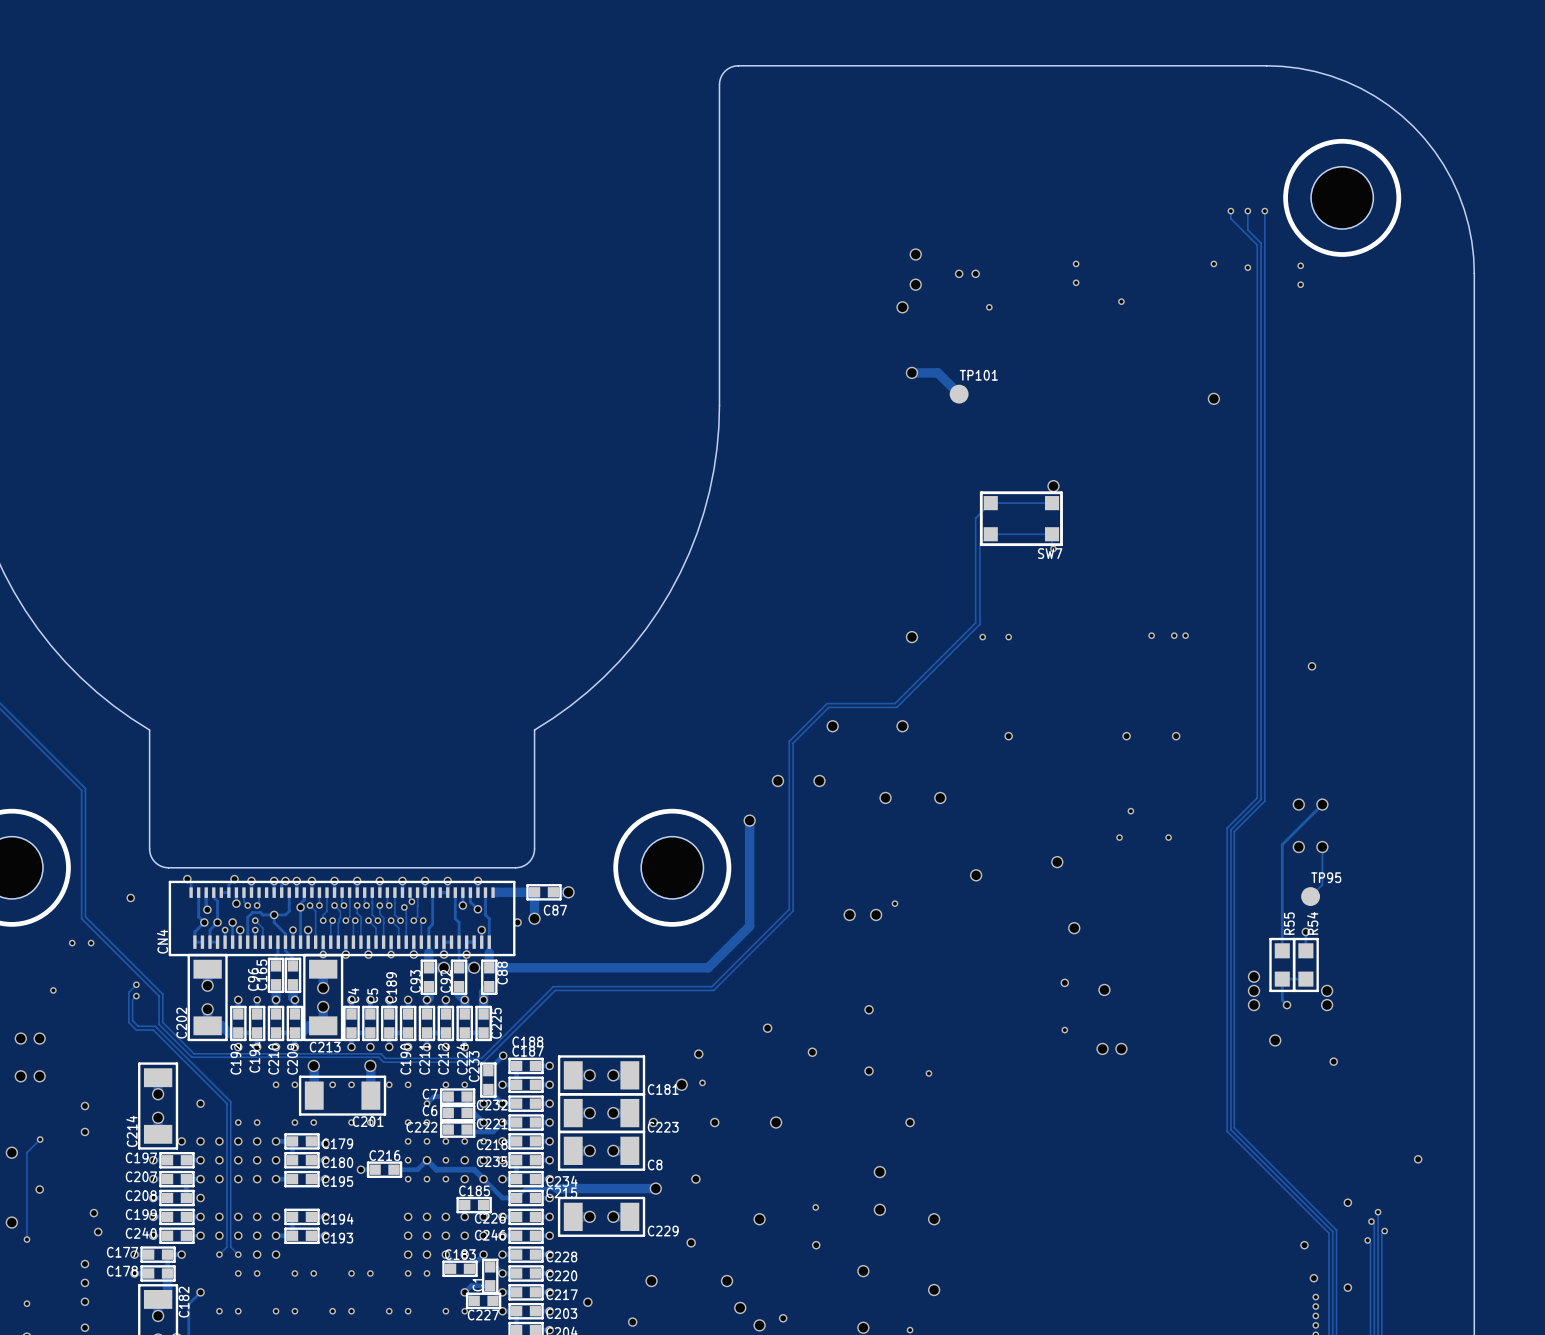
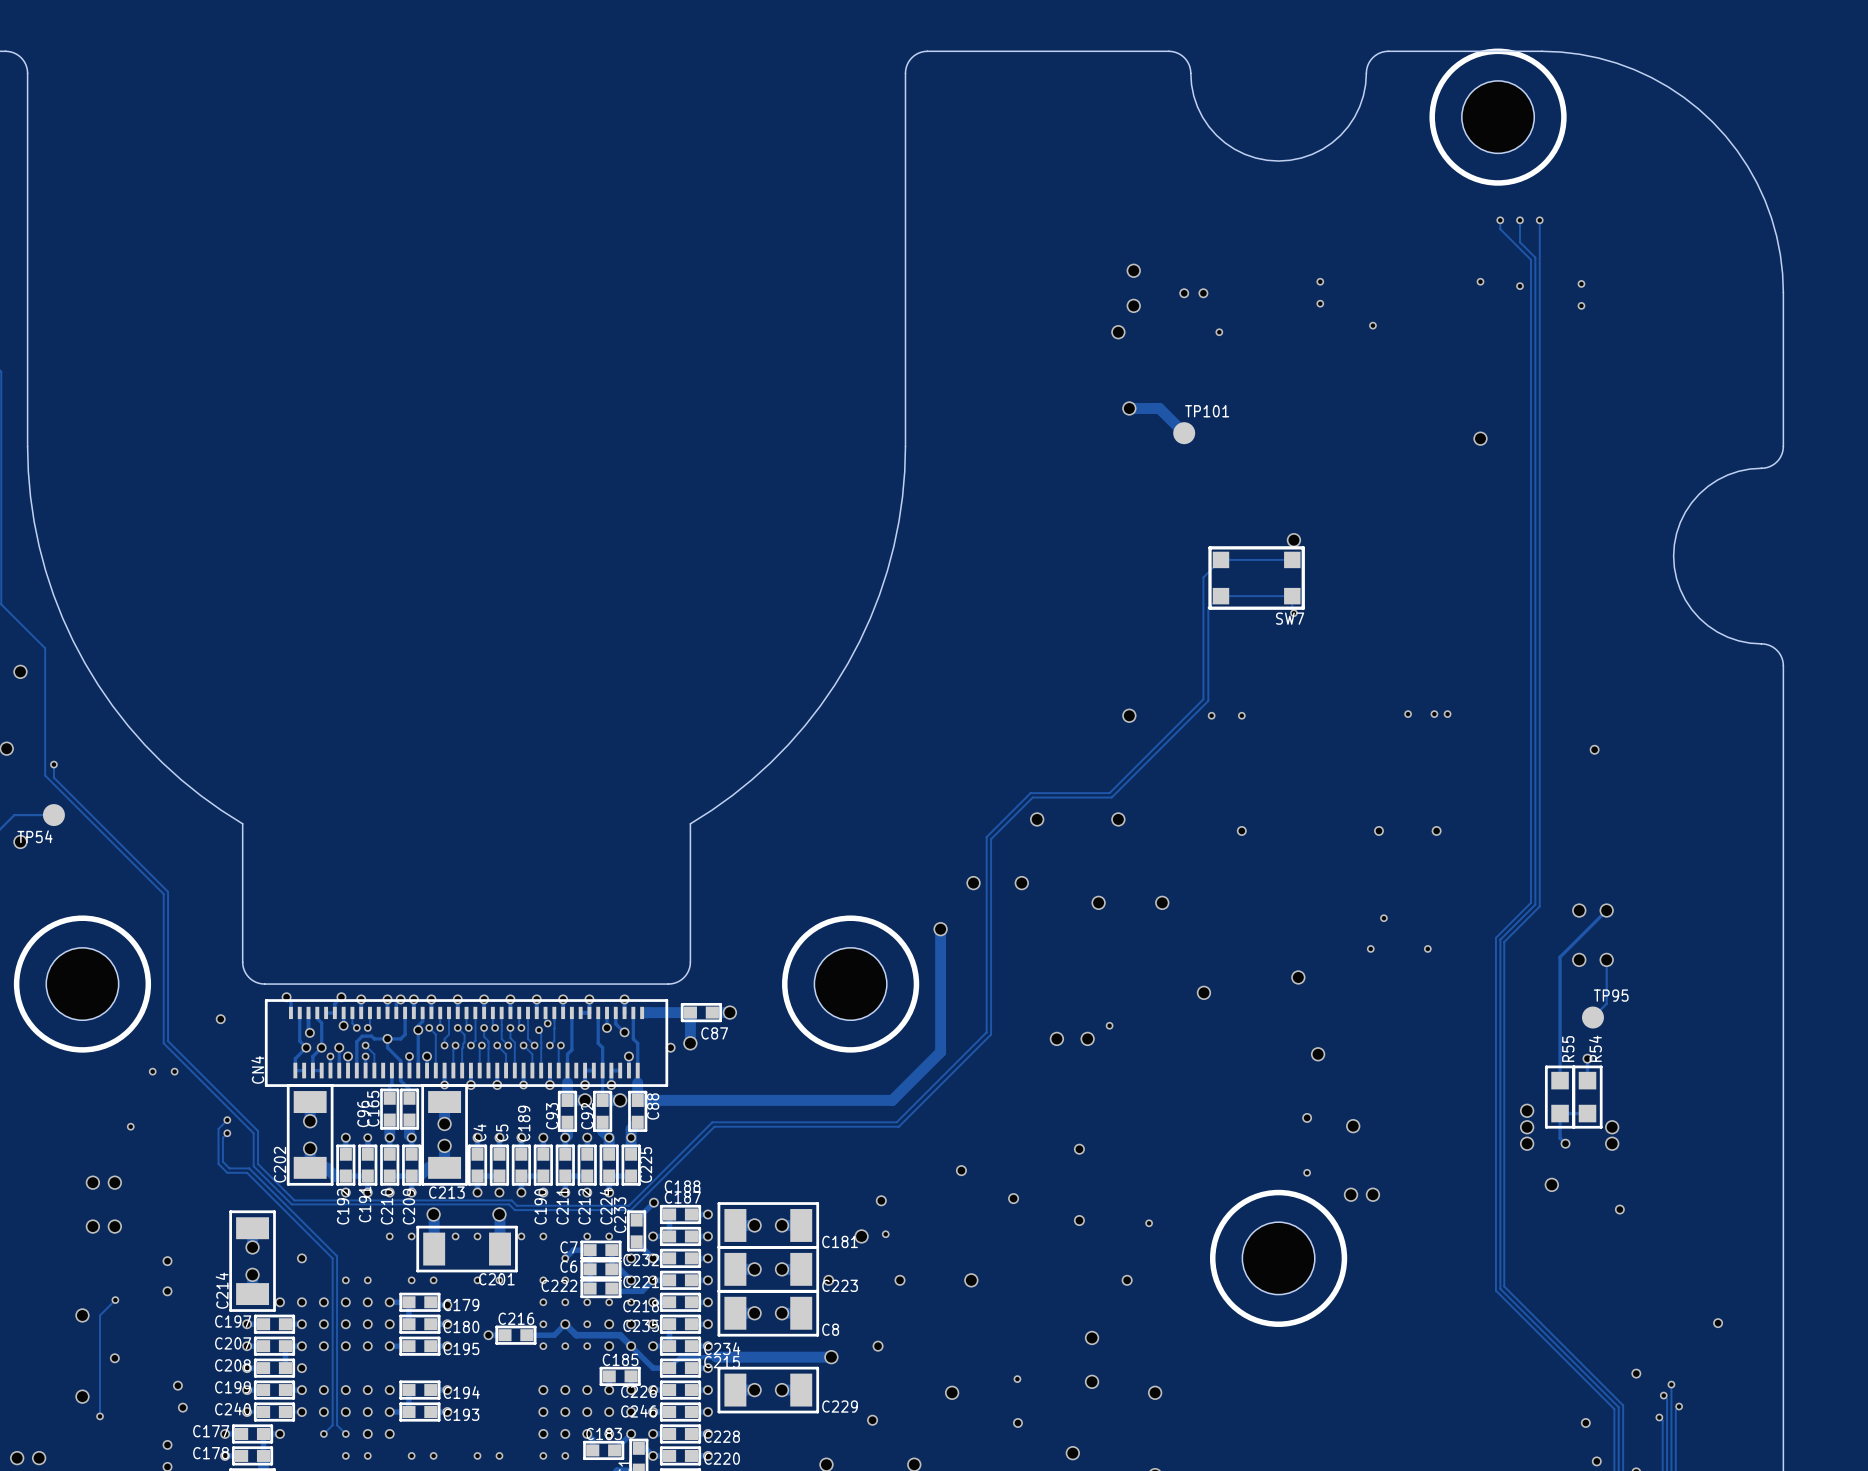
board edge: (1134, 65) (945, 65) -> (1388, 51) (1377, 54) (1369, 62) (1359, 106) (1340, 135) (1312, 154) (1278, 161) (1244, 154) (1216, 135) (1197, 106) (1187, 62) (1179, 54) (1168, 51)
part position: (1342, 197) -> (1498, 117)
board edge: (1474, 405) (1474, 594) -> (1783, 446) (1780, 457) (1772, 465) (1727, 474) (1699, 494) (1680, 522) (1673, 556) (1680, 589) (1699, 618) (1727, 637) (1772, 646) (1780, 654) (1783, 665)
part: none -> (1278, 1258)

